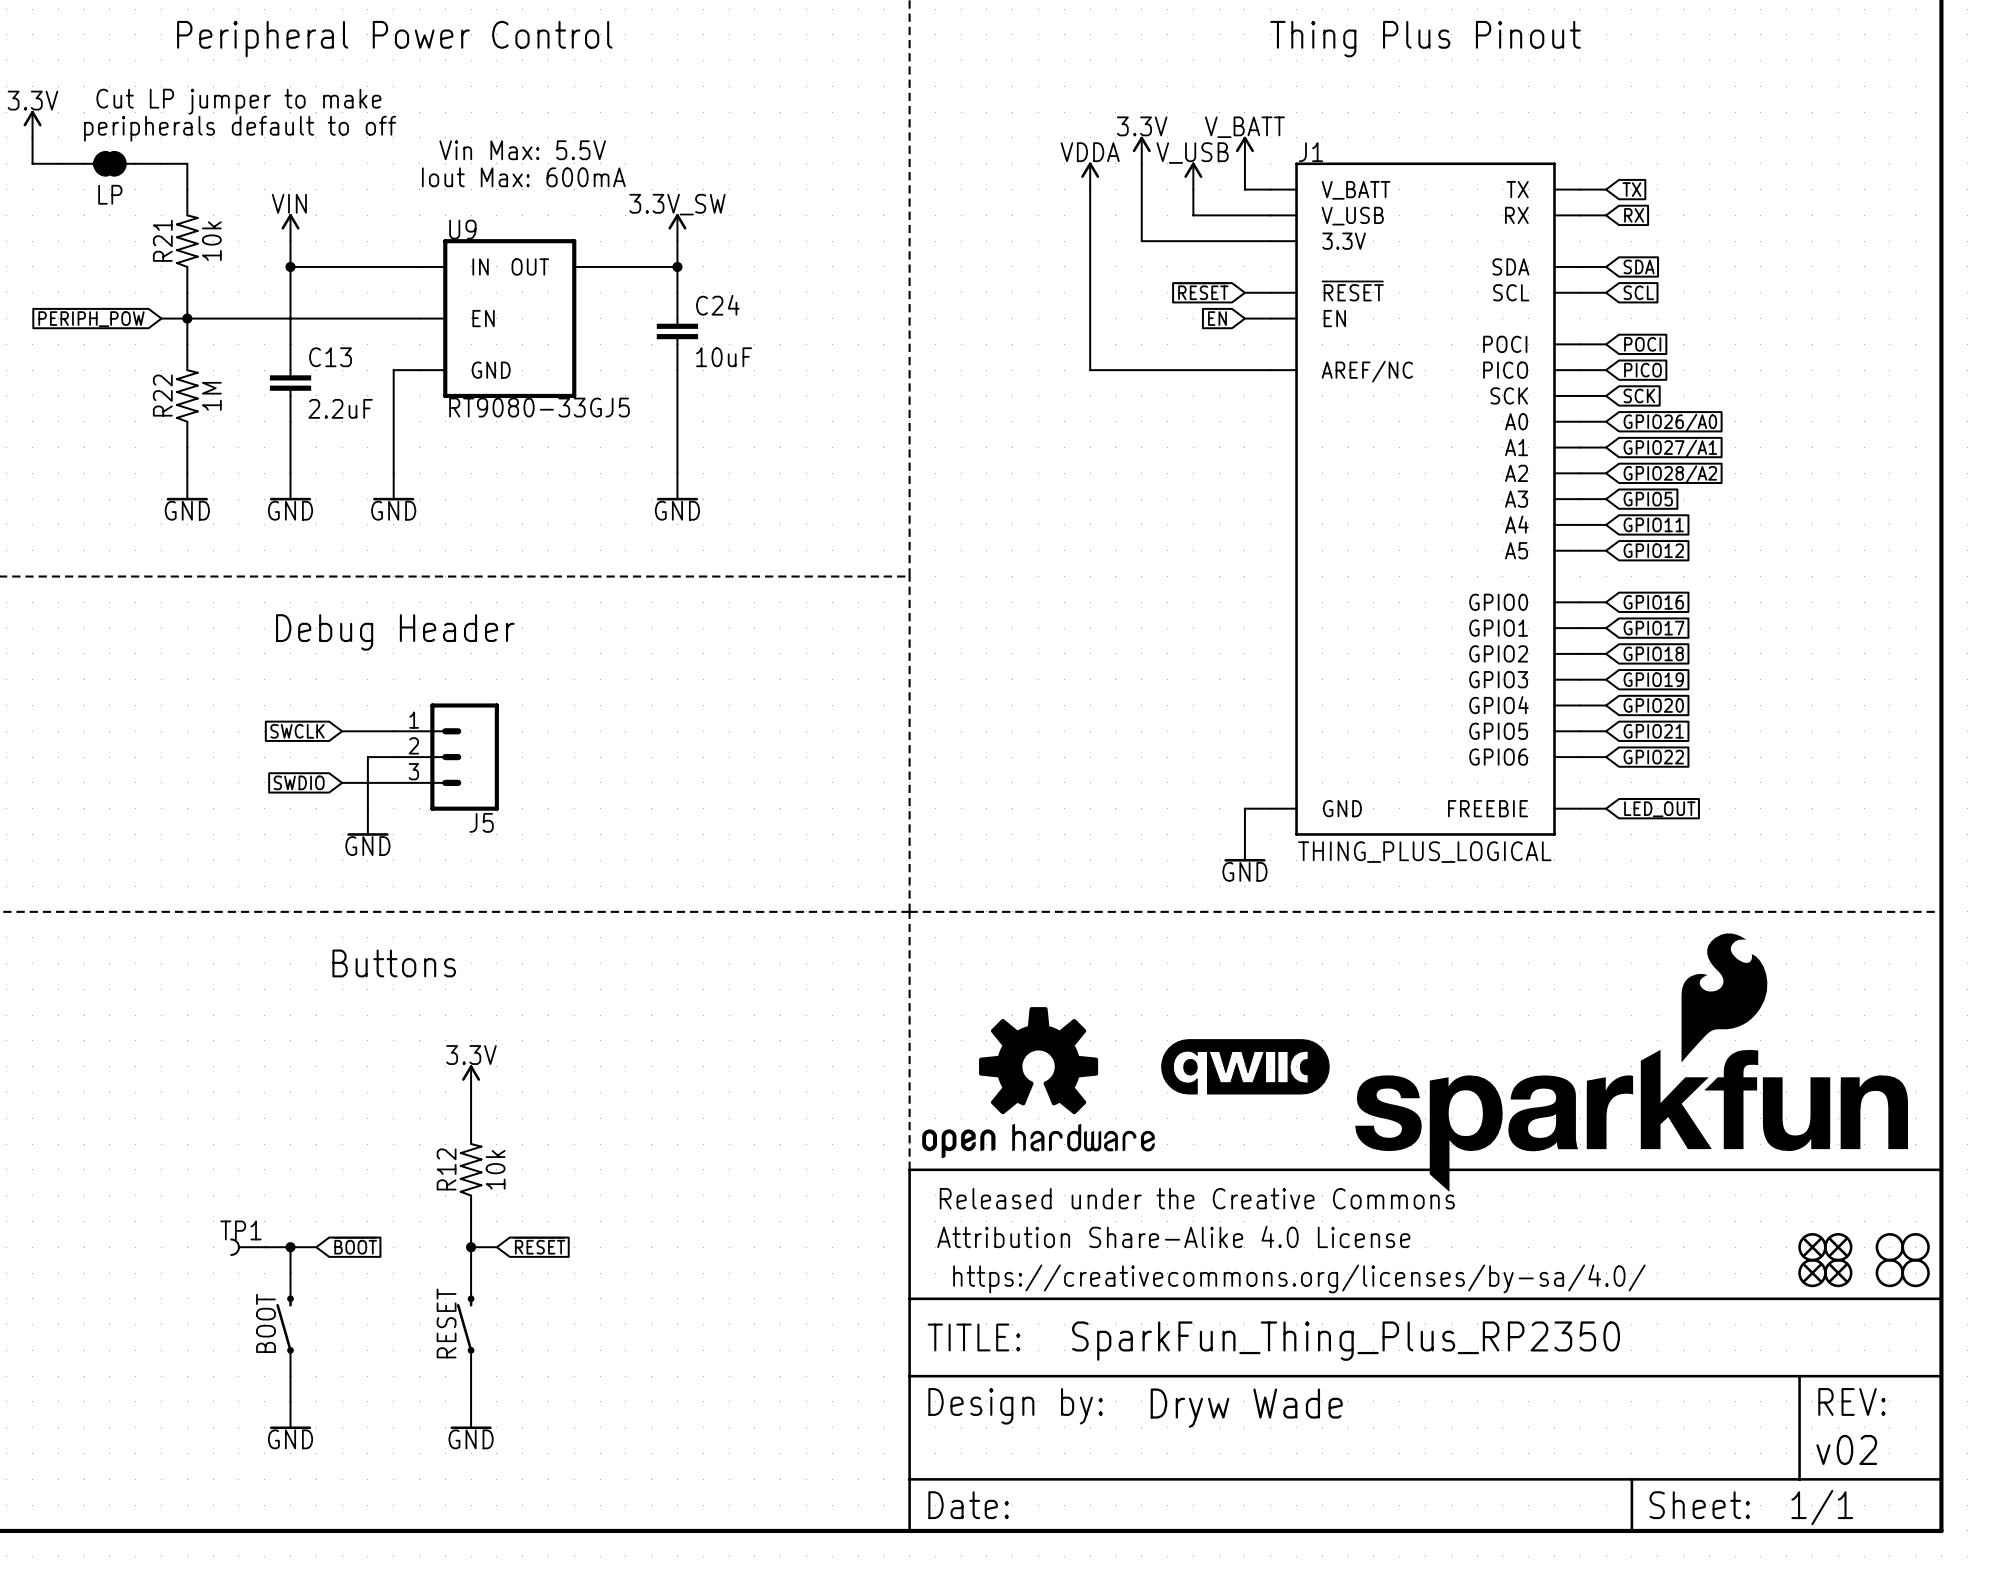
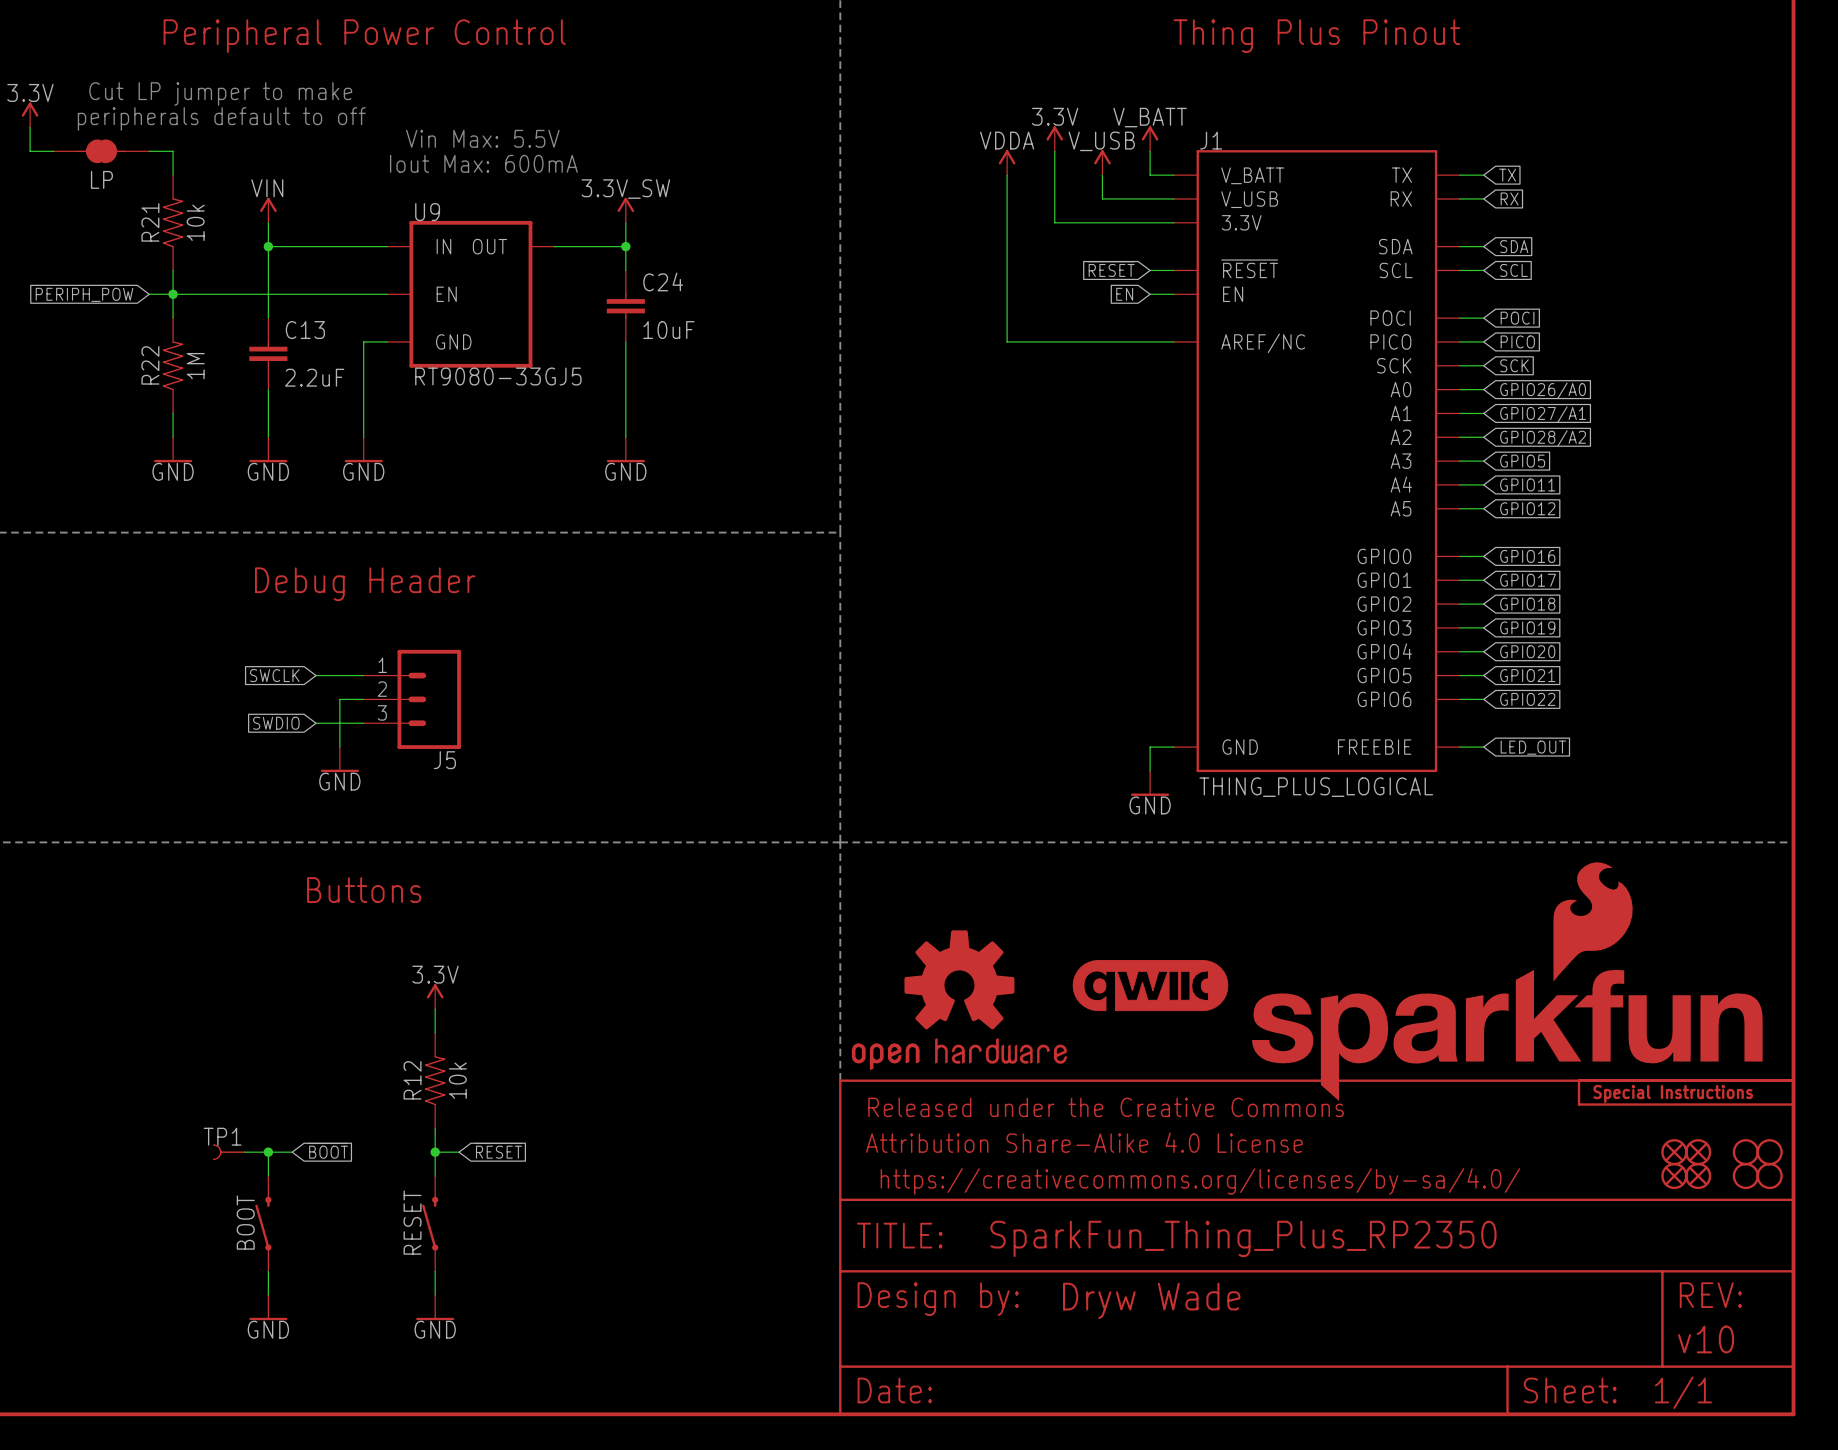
part: none -> (1686, 1092)
part text: v02 (1846, 1449) -> v10 (1706, 1339)

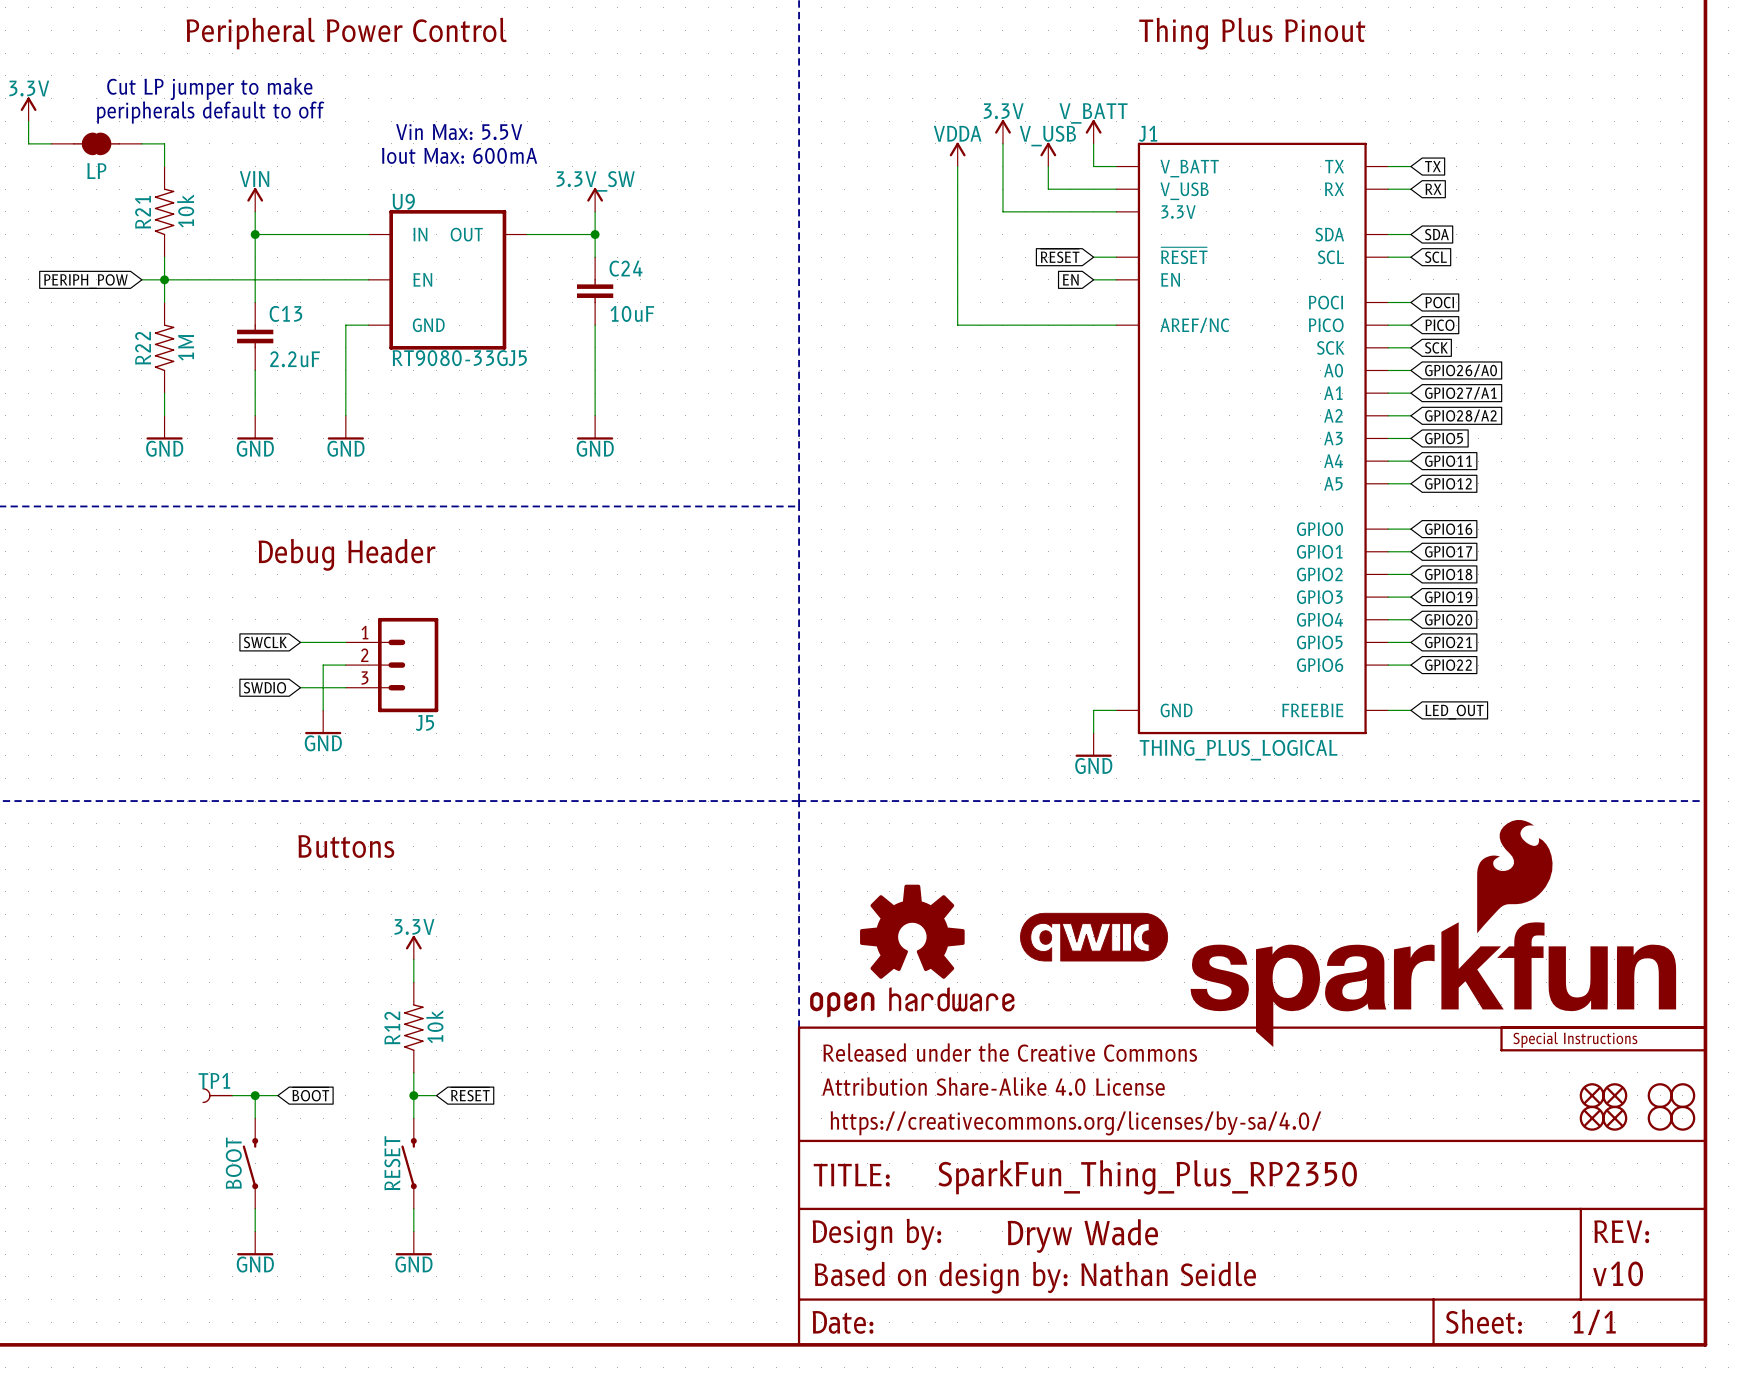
text: none -> Based on design by: Nathan Seidle (1035, 1277)

